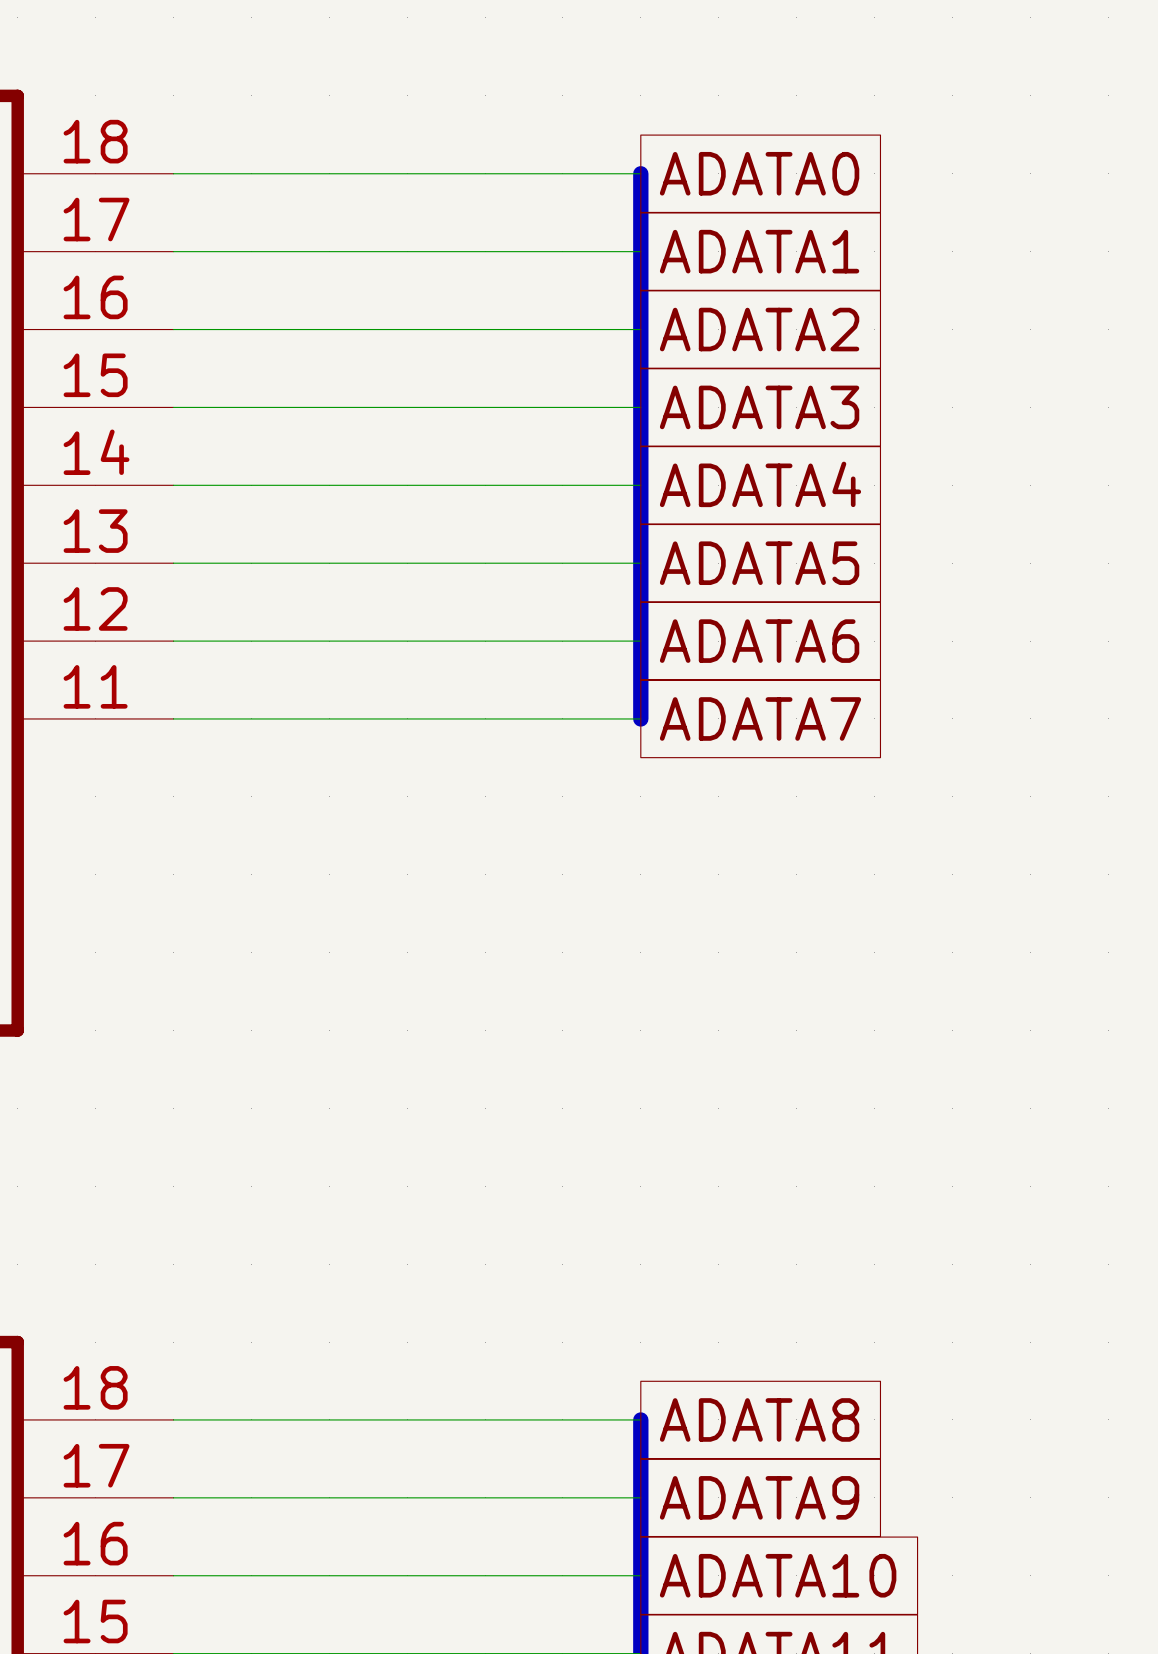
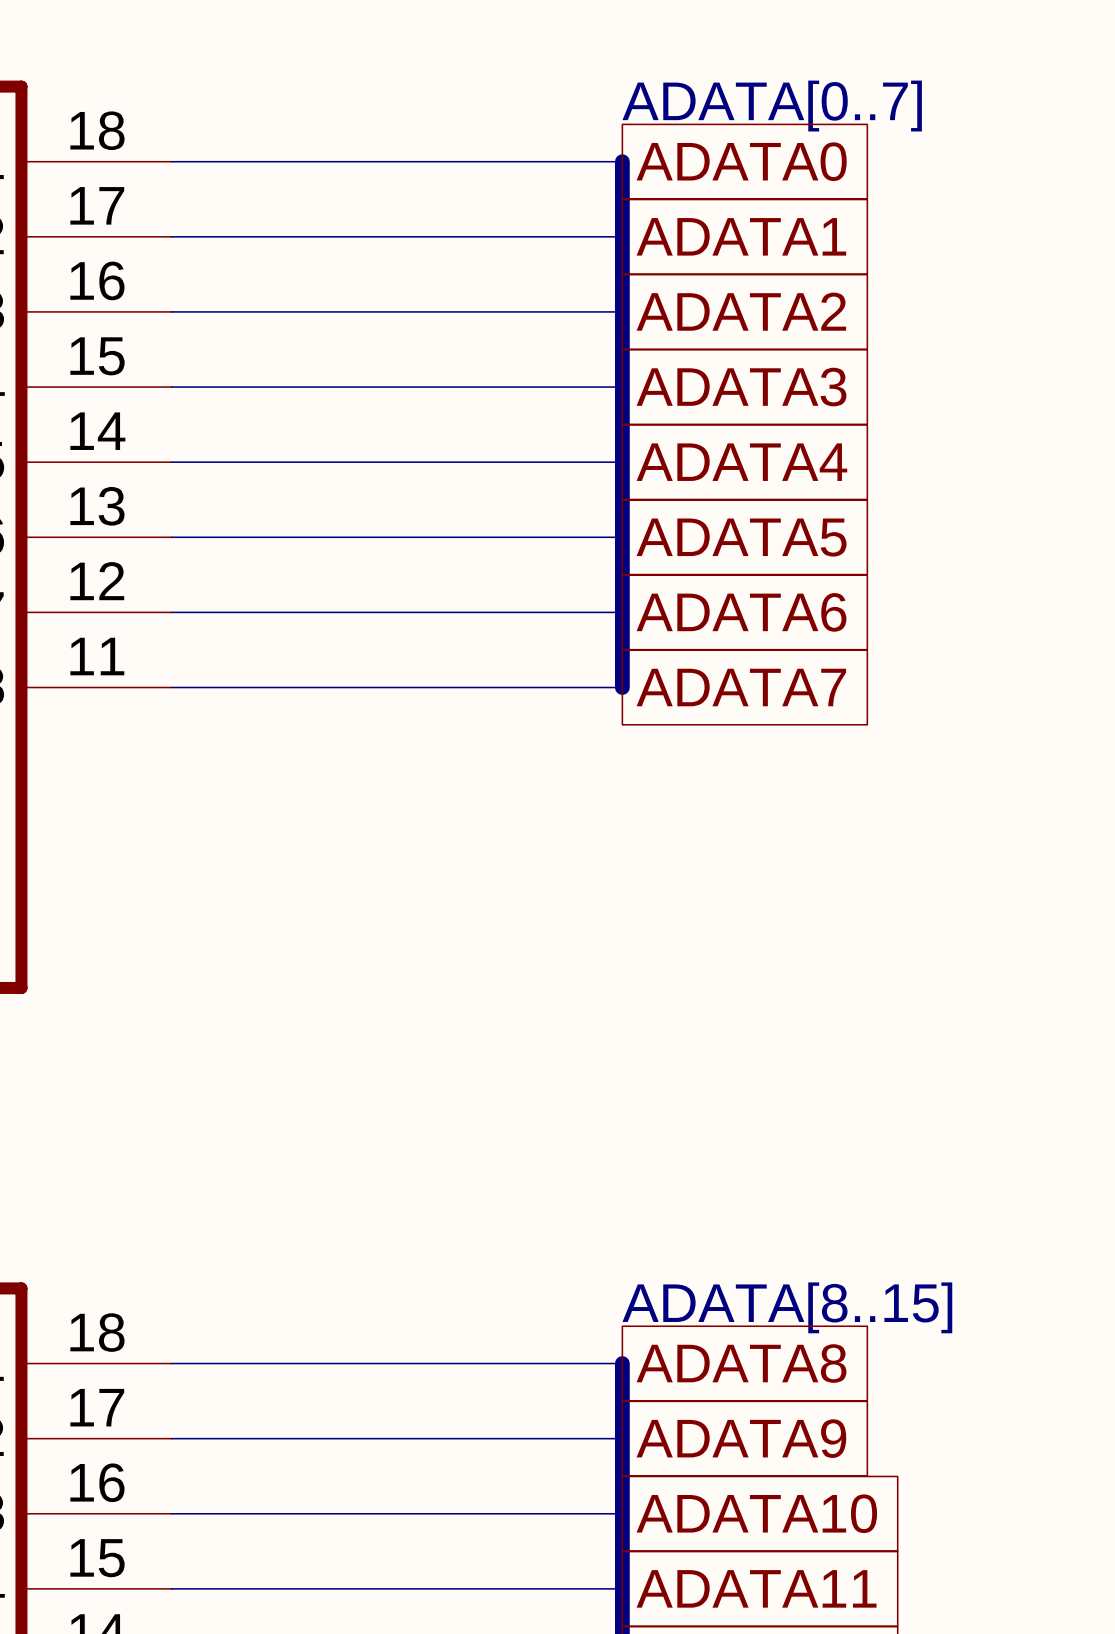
text: none -> ADATA[0..7] (772, 106)
text: none -> ADATA[8..15] (787, 1307)

